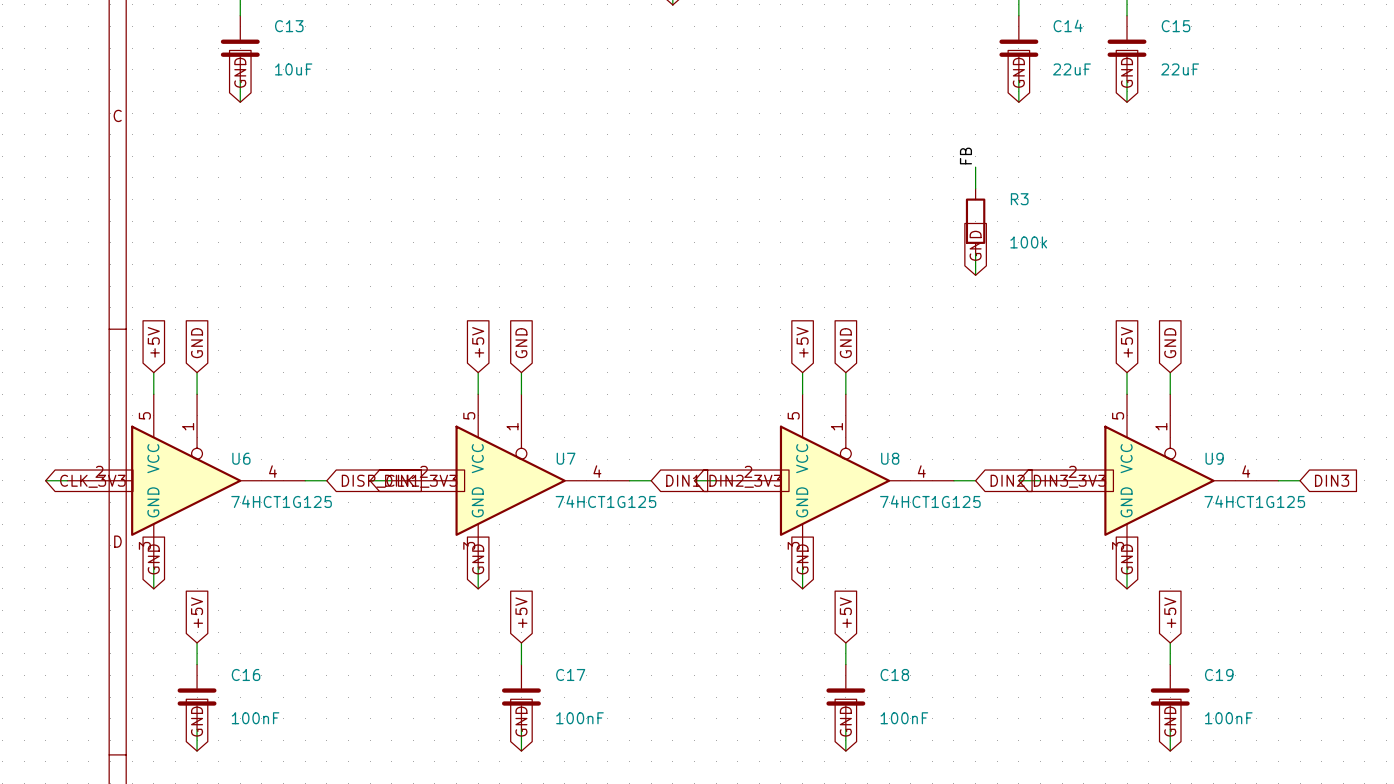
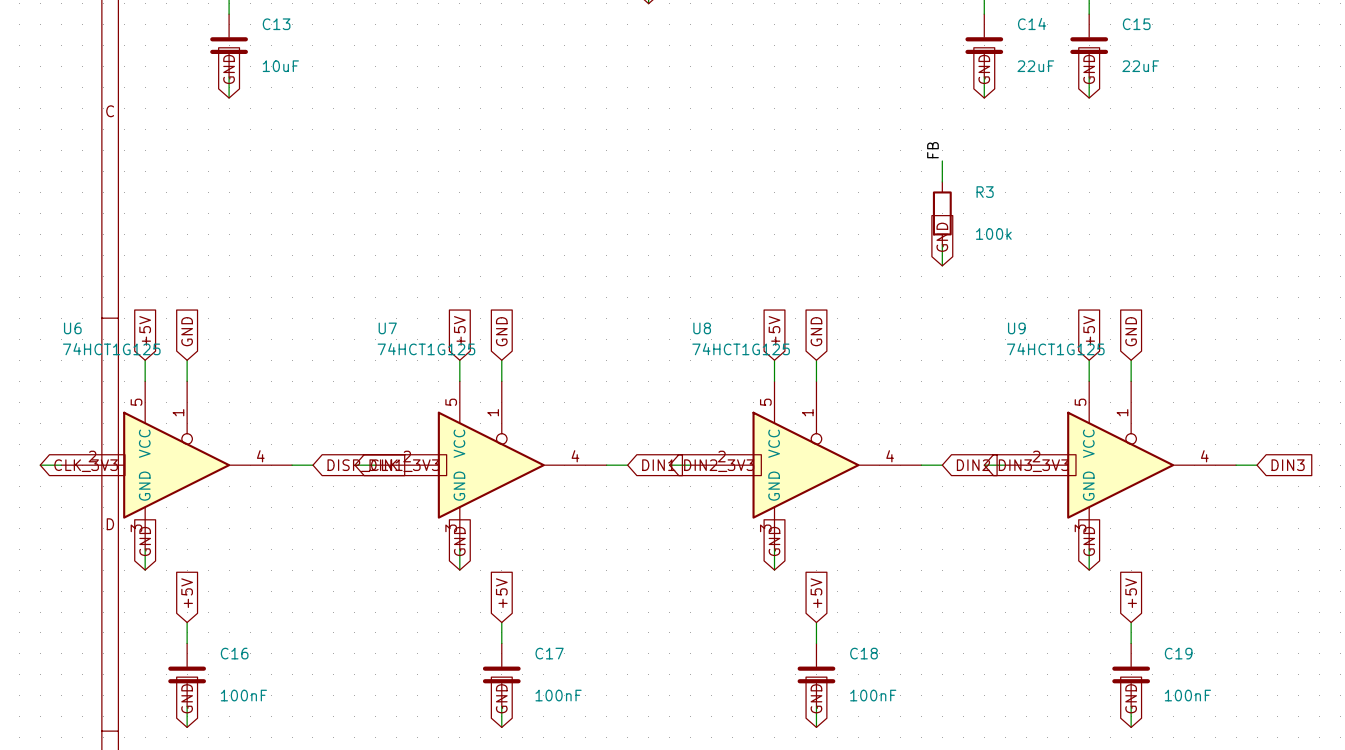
U6 name position: U6 (241, 458) -> U6 (72, 328)
U7 name position: U7 (566, 458) -> U7 (387, 328)
U8 name position: U8 (890, 458) -> U8 (702, 328)
U9 name position: U9 (1214, 458) -> U9 (1016, 328)
U6 value position: 74HCT1G125 (281, 501) -> 74HCT1G125 (111, 349)
U7 value position: 74HCT1G125 (605, 501) -> 74HCT1G125 (426, 349)
U8 value position: 74HCT1G125 (930, 501) -> 74HCT1G125 (741, 349)
U9 value position: 74HCT1G125 (1254, 501) -> 74HCT1G125 (1055, 349)

